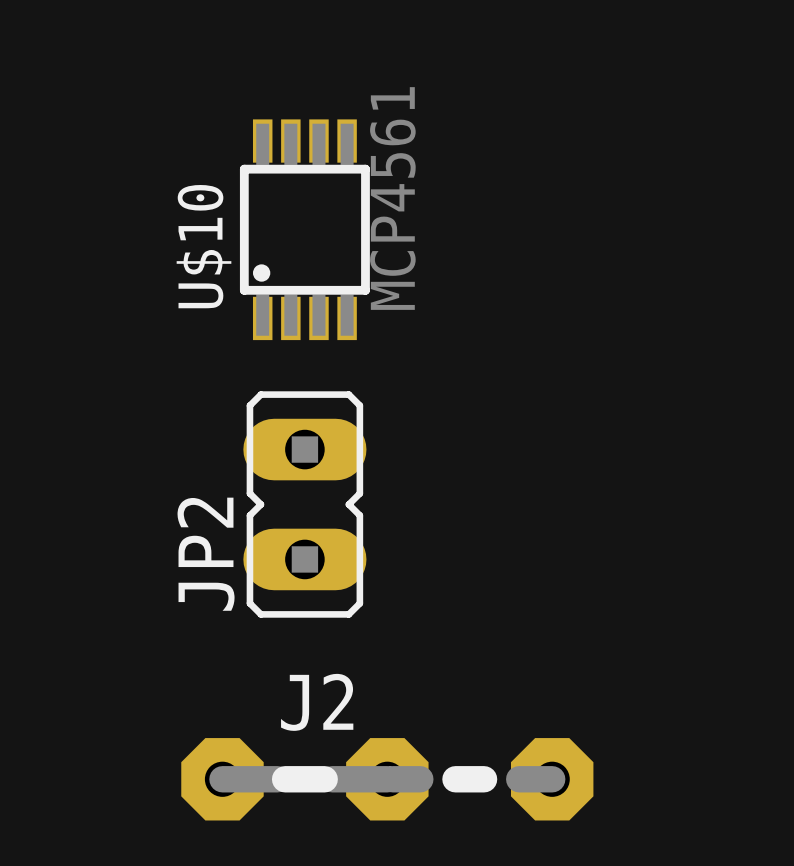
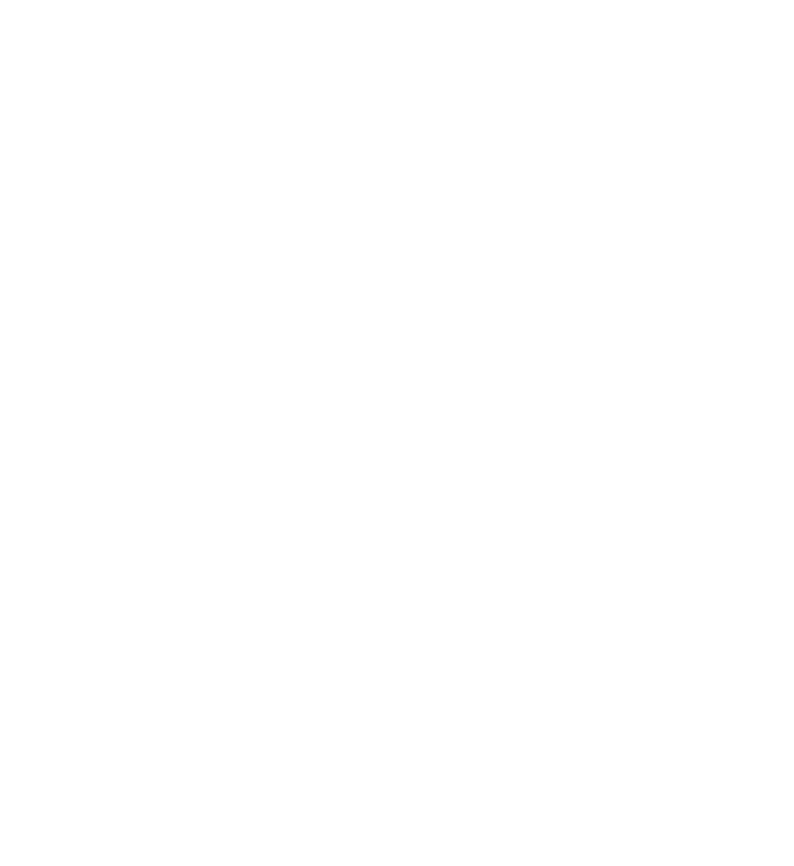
U$10: MCP4561 (304, 229) -> none
JP2: (304, 504) -> none
J2: (387, 779) -> none

